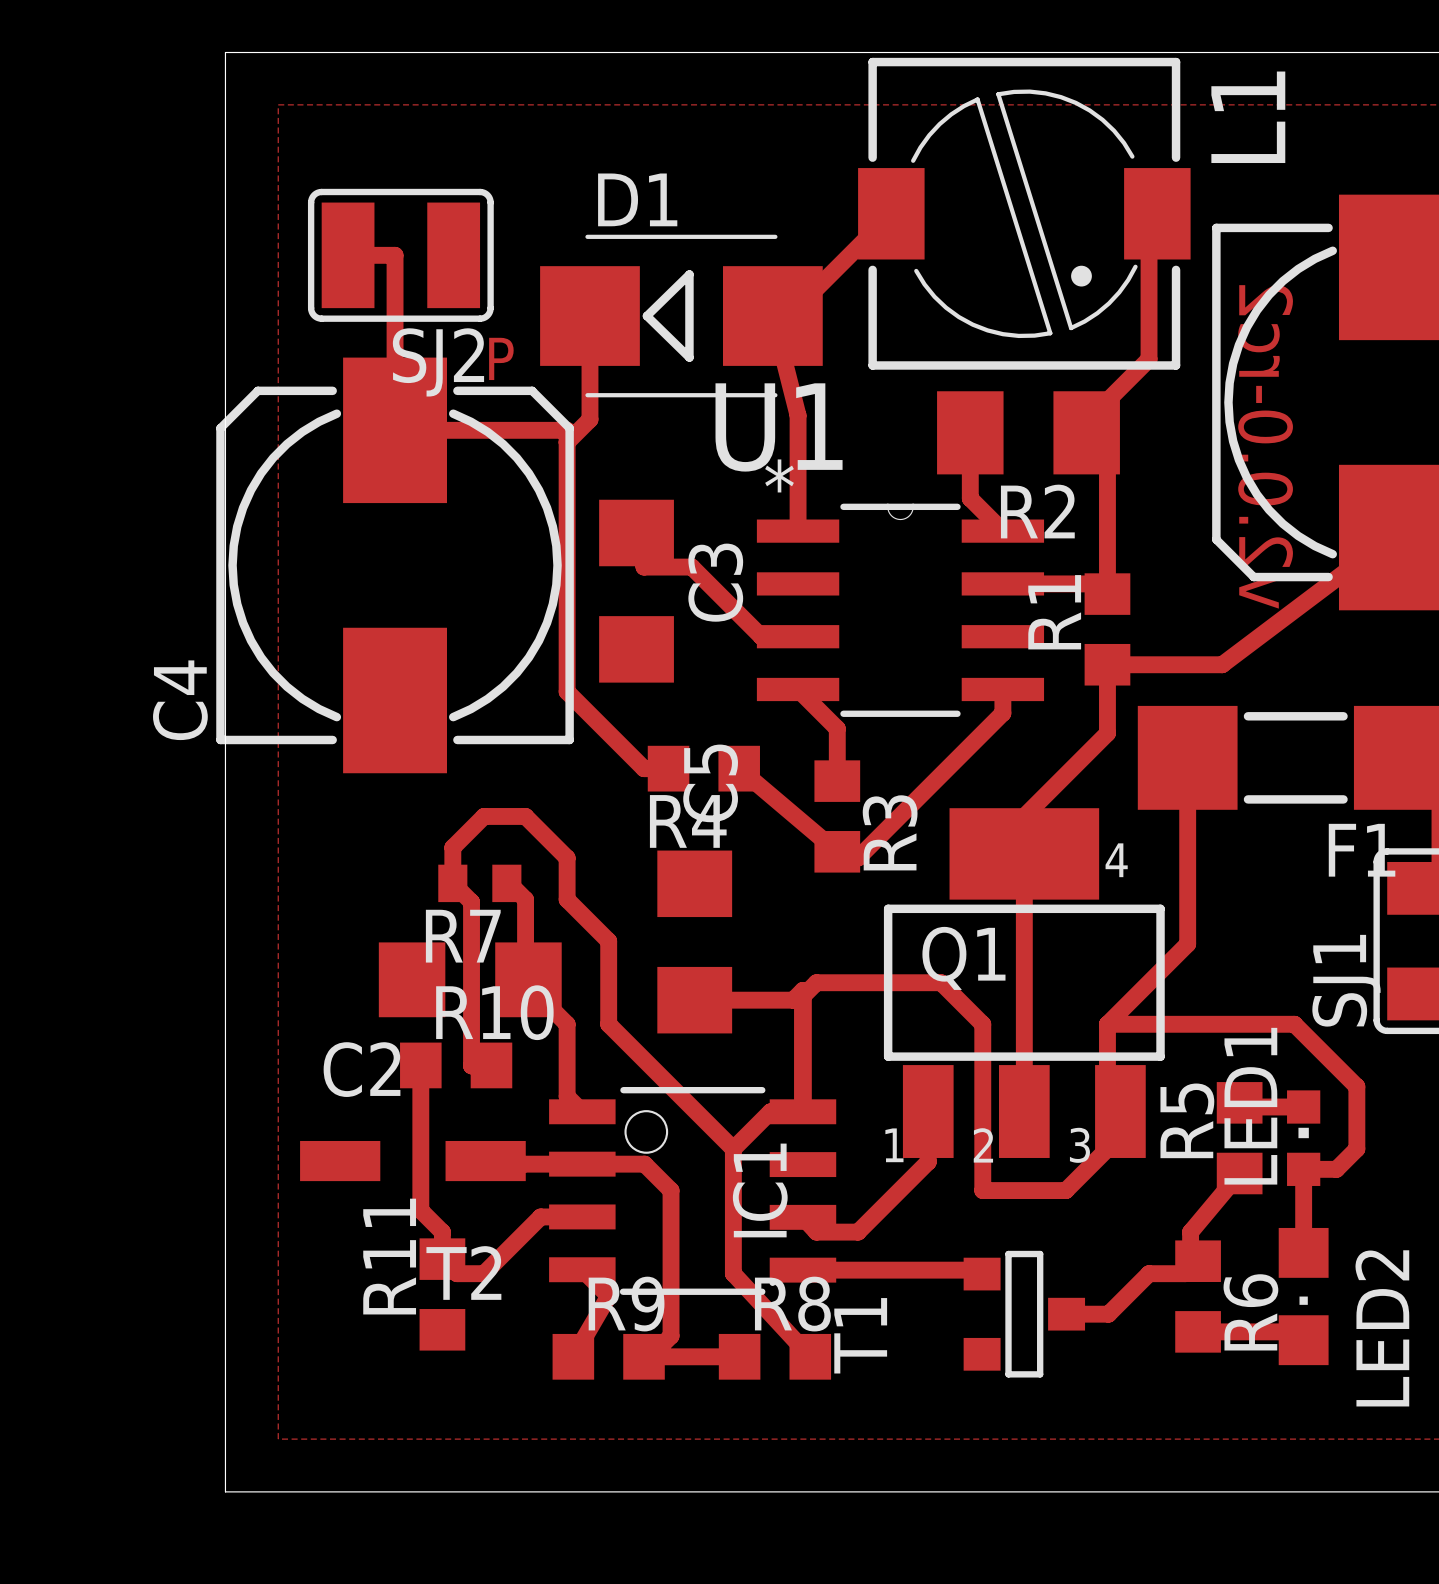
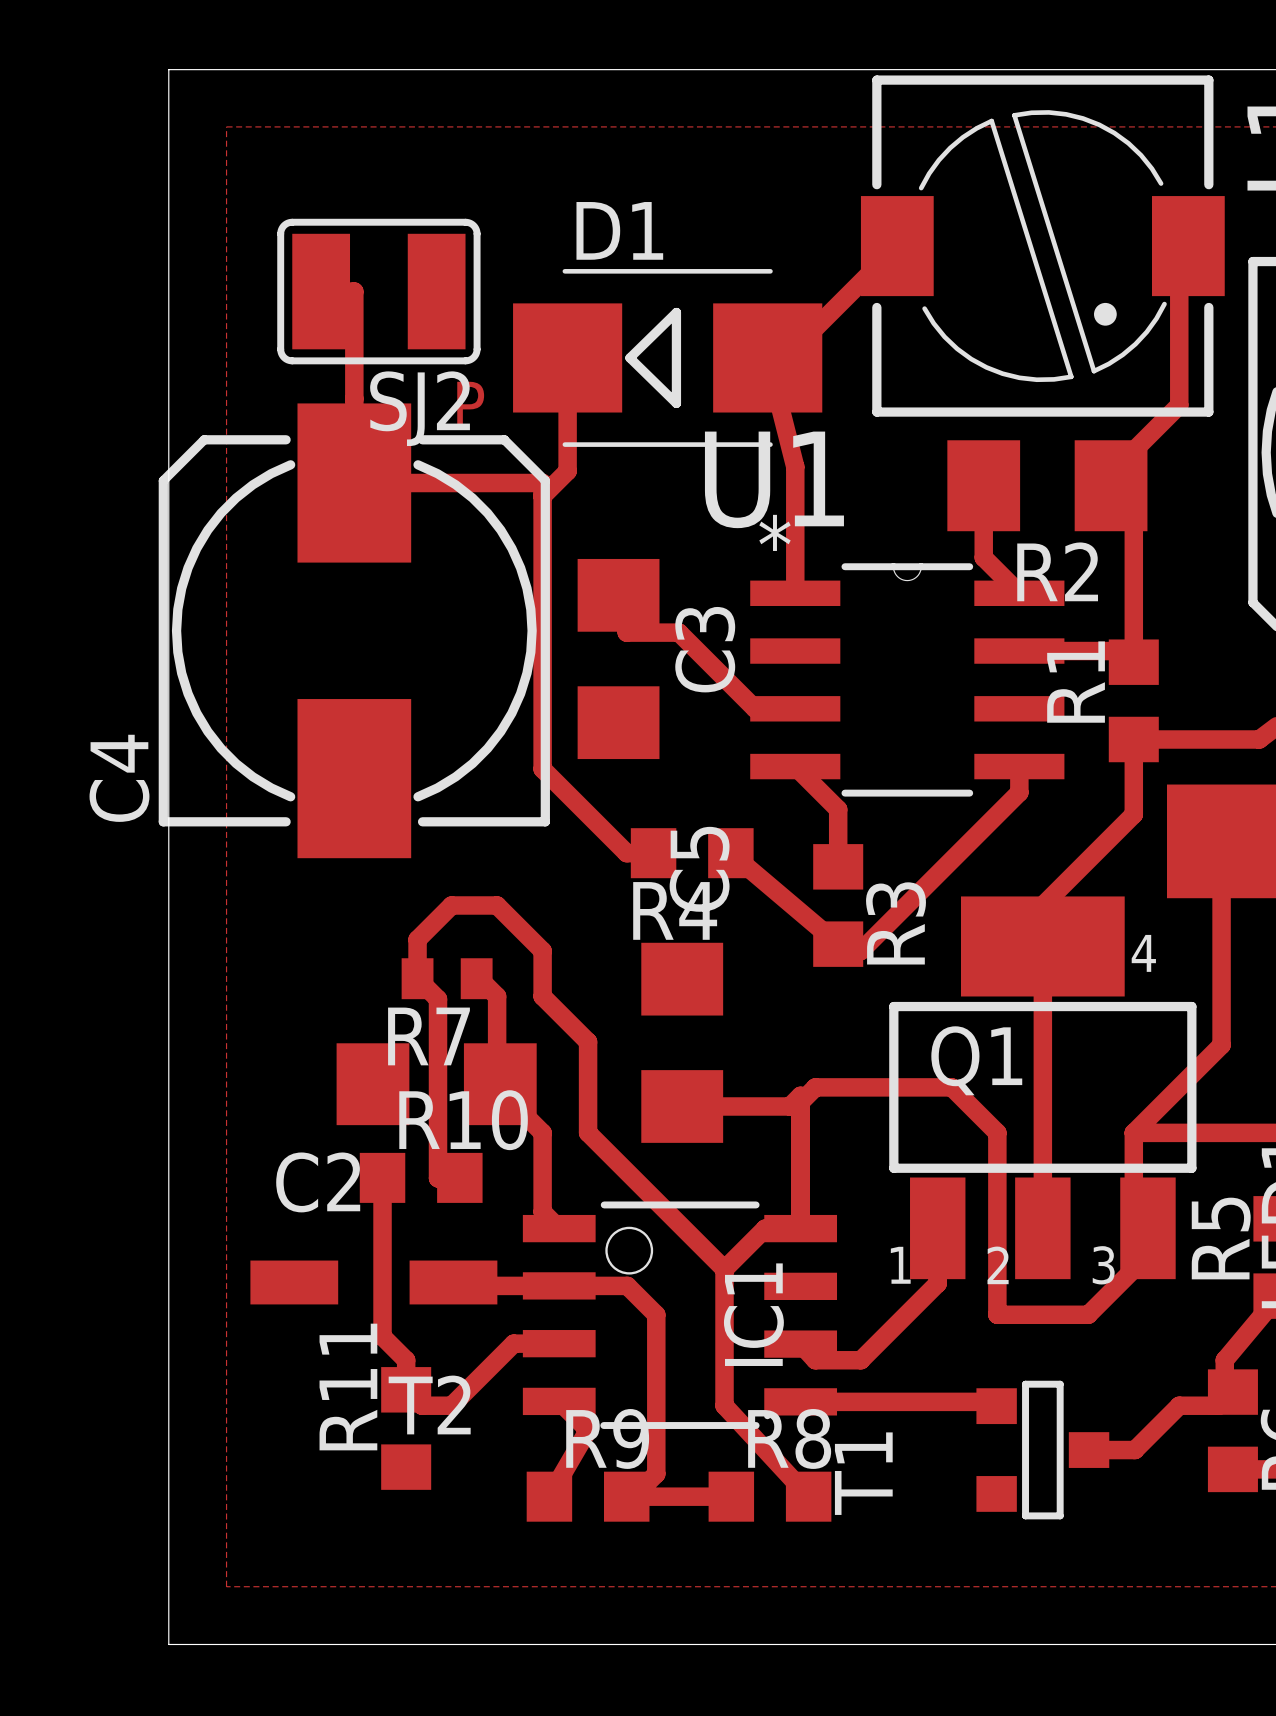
SJ2 position: (400, 255) -> (378, 291)

